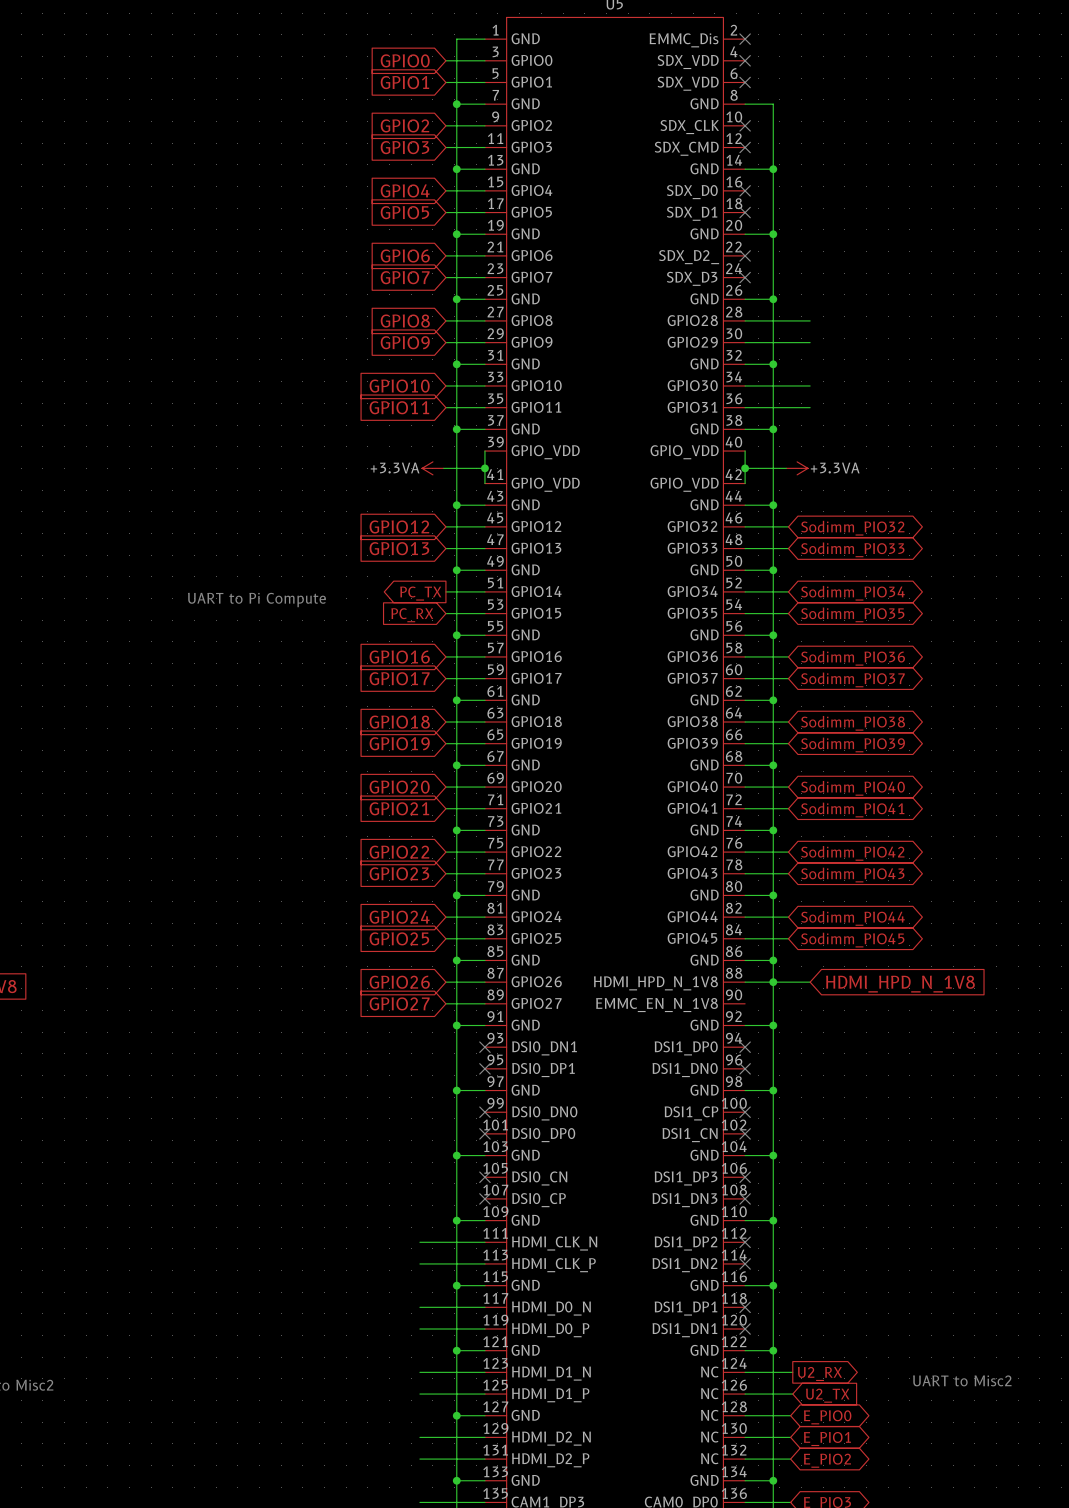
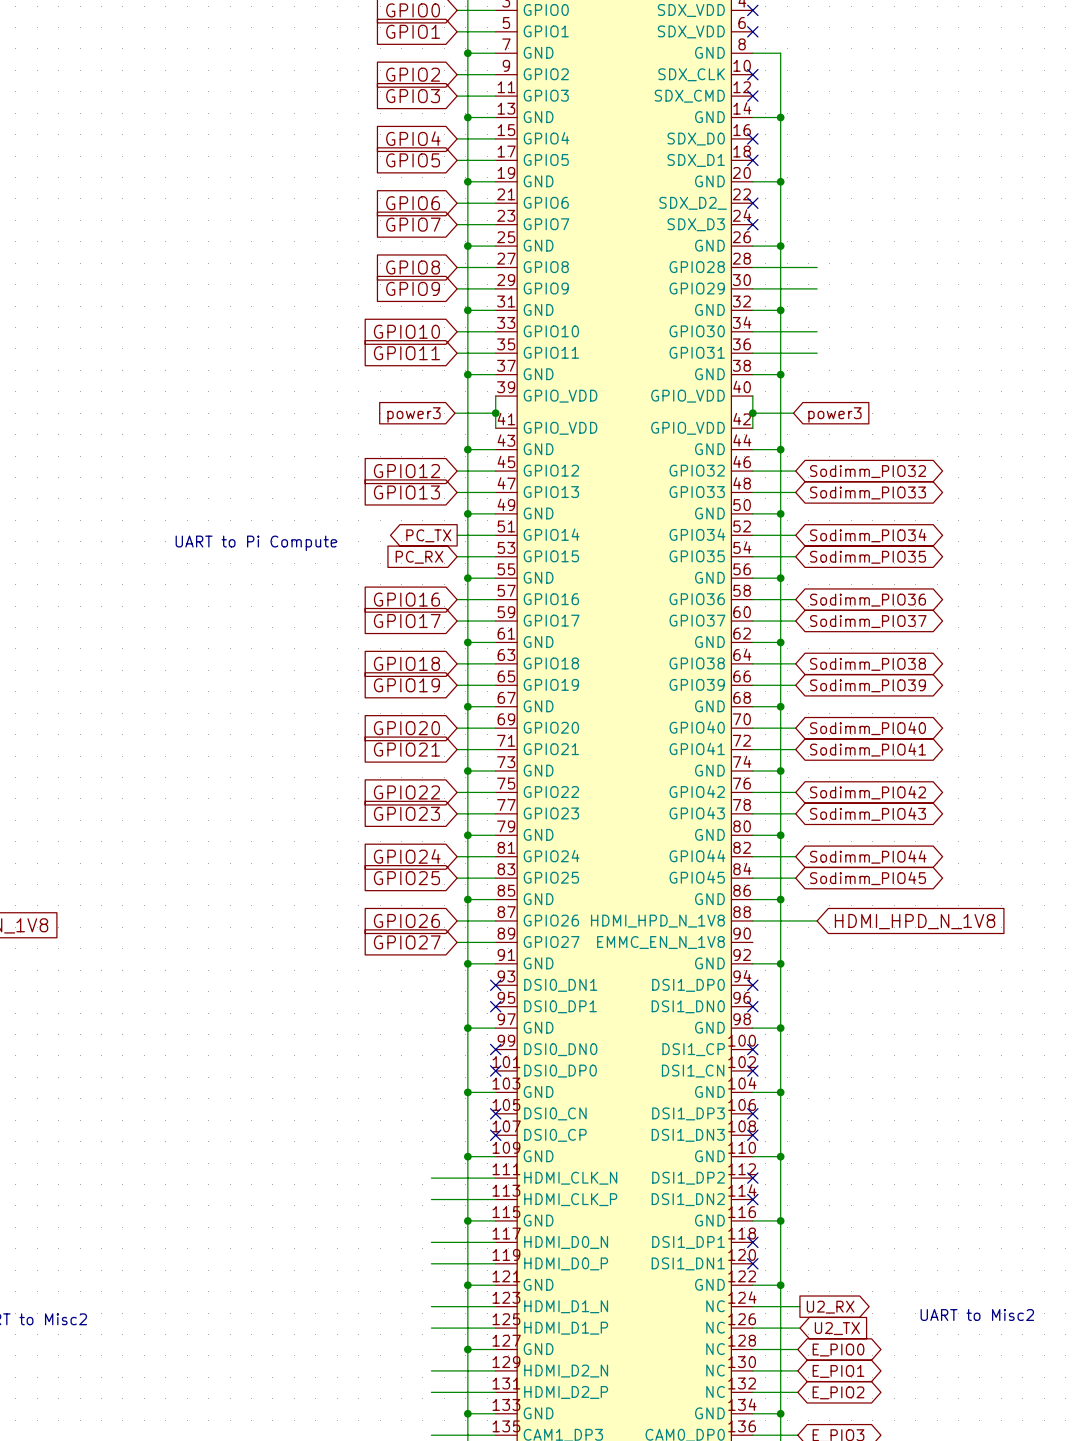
power symbol: +3.3VA (432, 468) -> none
power symbol: +3.3VA (797, 468) -> none
global label: none -> power3 (414, 414)
global label: none -> power3 (834, 414)
junction: (773, 982) -> none

